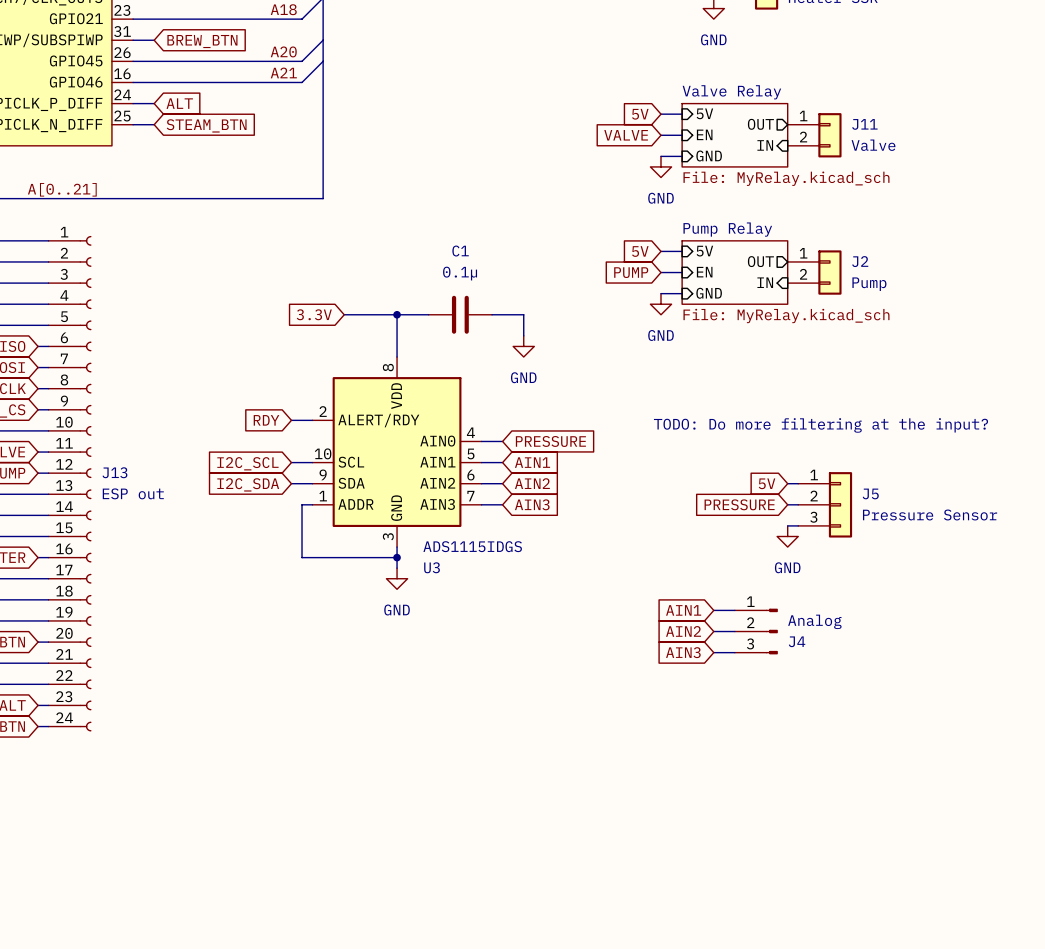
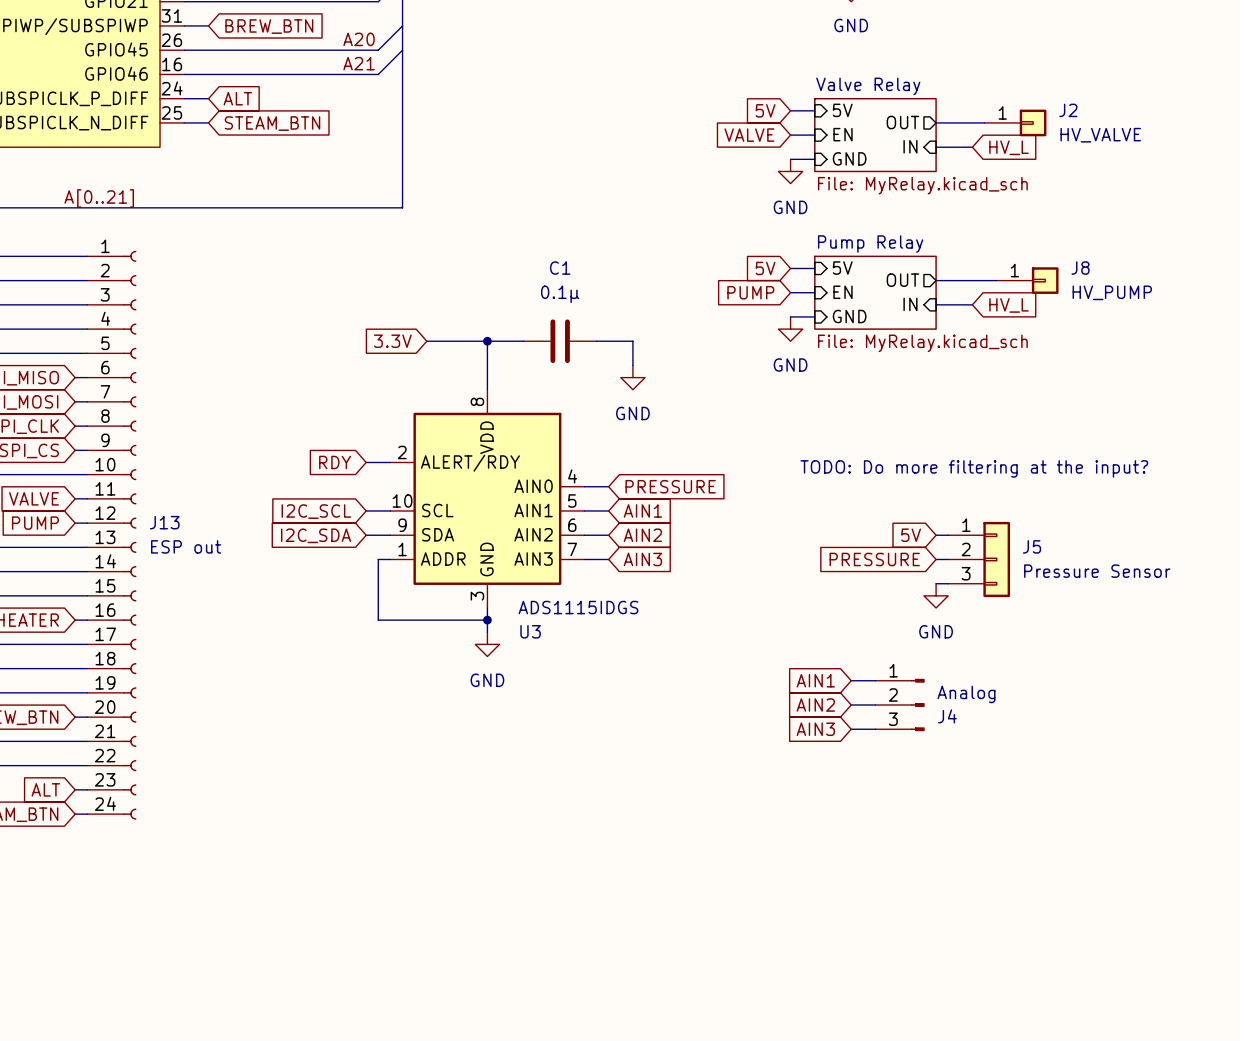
J11: Valve (814, 135) -> none
global label: none -> HV_L (1008, 147)
J2 symbol: [787, 250, 842, 295] -> [984, 109, 1047, 137]
J8: none -> HV_PUMP (1027, 280)
global label: none -> HV_L (1008, 305)
J2 value: Pump (869, 284) -> HV_VALVE (1100, 135)

